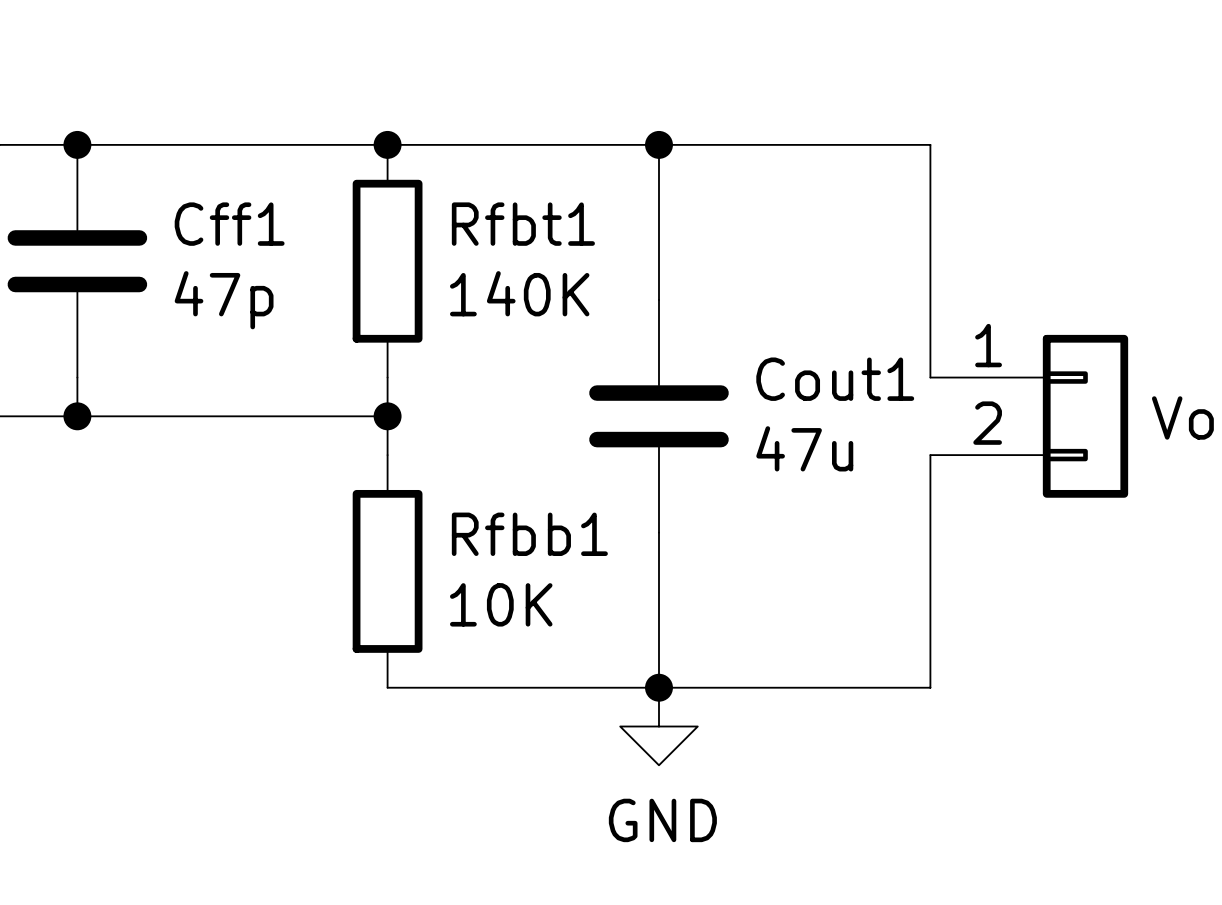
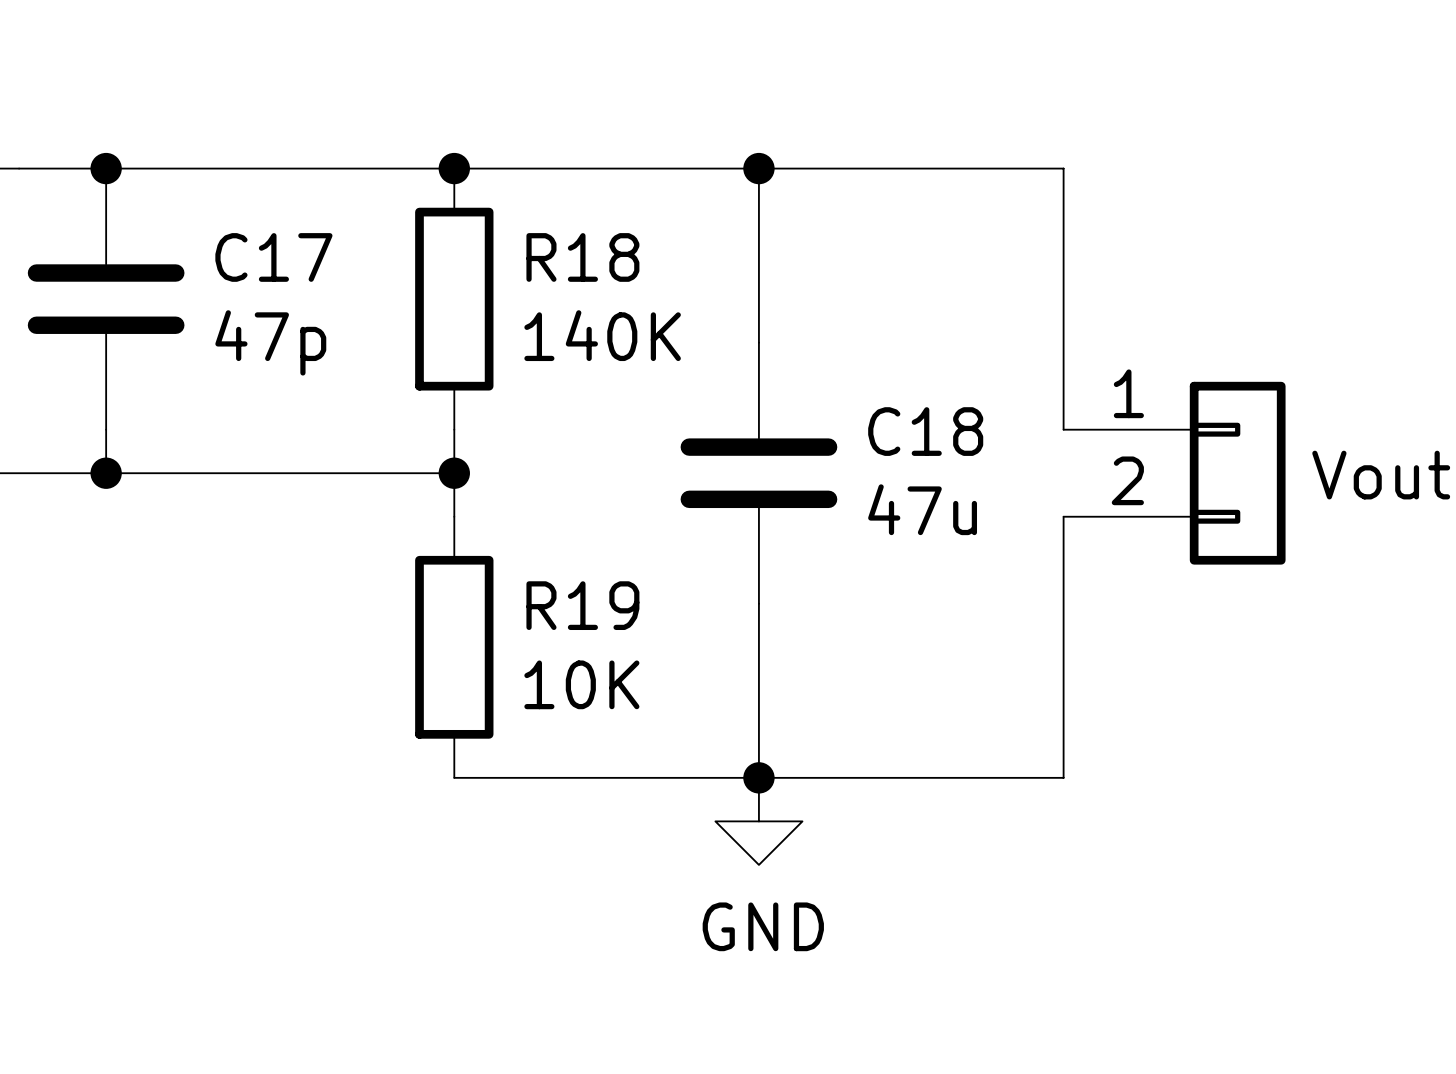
Cff1 name: Cff1 (229, 224) -> C17 (273, 257)
Rfbt1 name: Rfbt1 (523, 224) -> R18 (582, 257)
Cout1 name: Cout1 (835, 379) -> C18 (925, 431)
Rfbb1 name: Rfbb1 (529, 534) -> R19 (582, 605)

